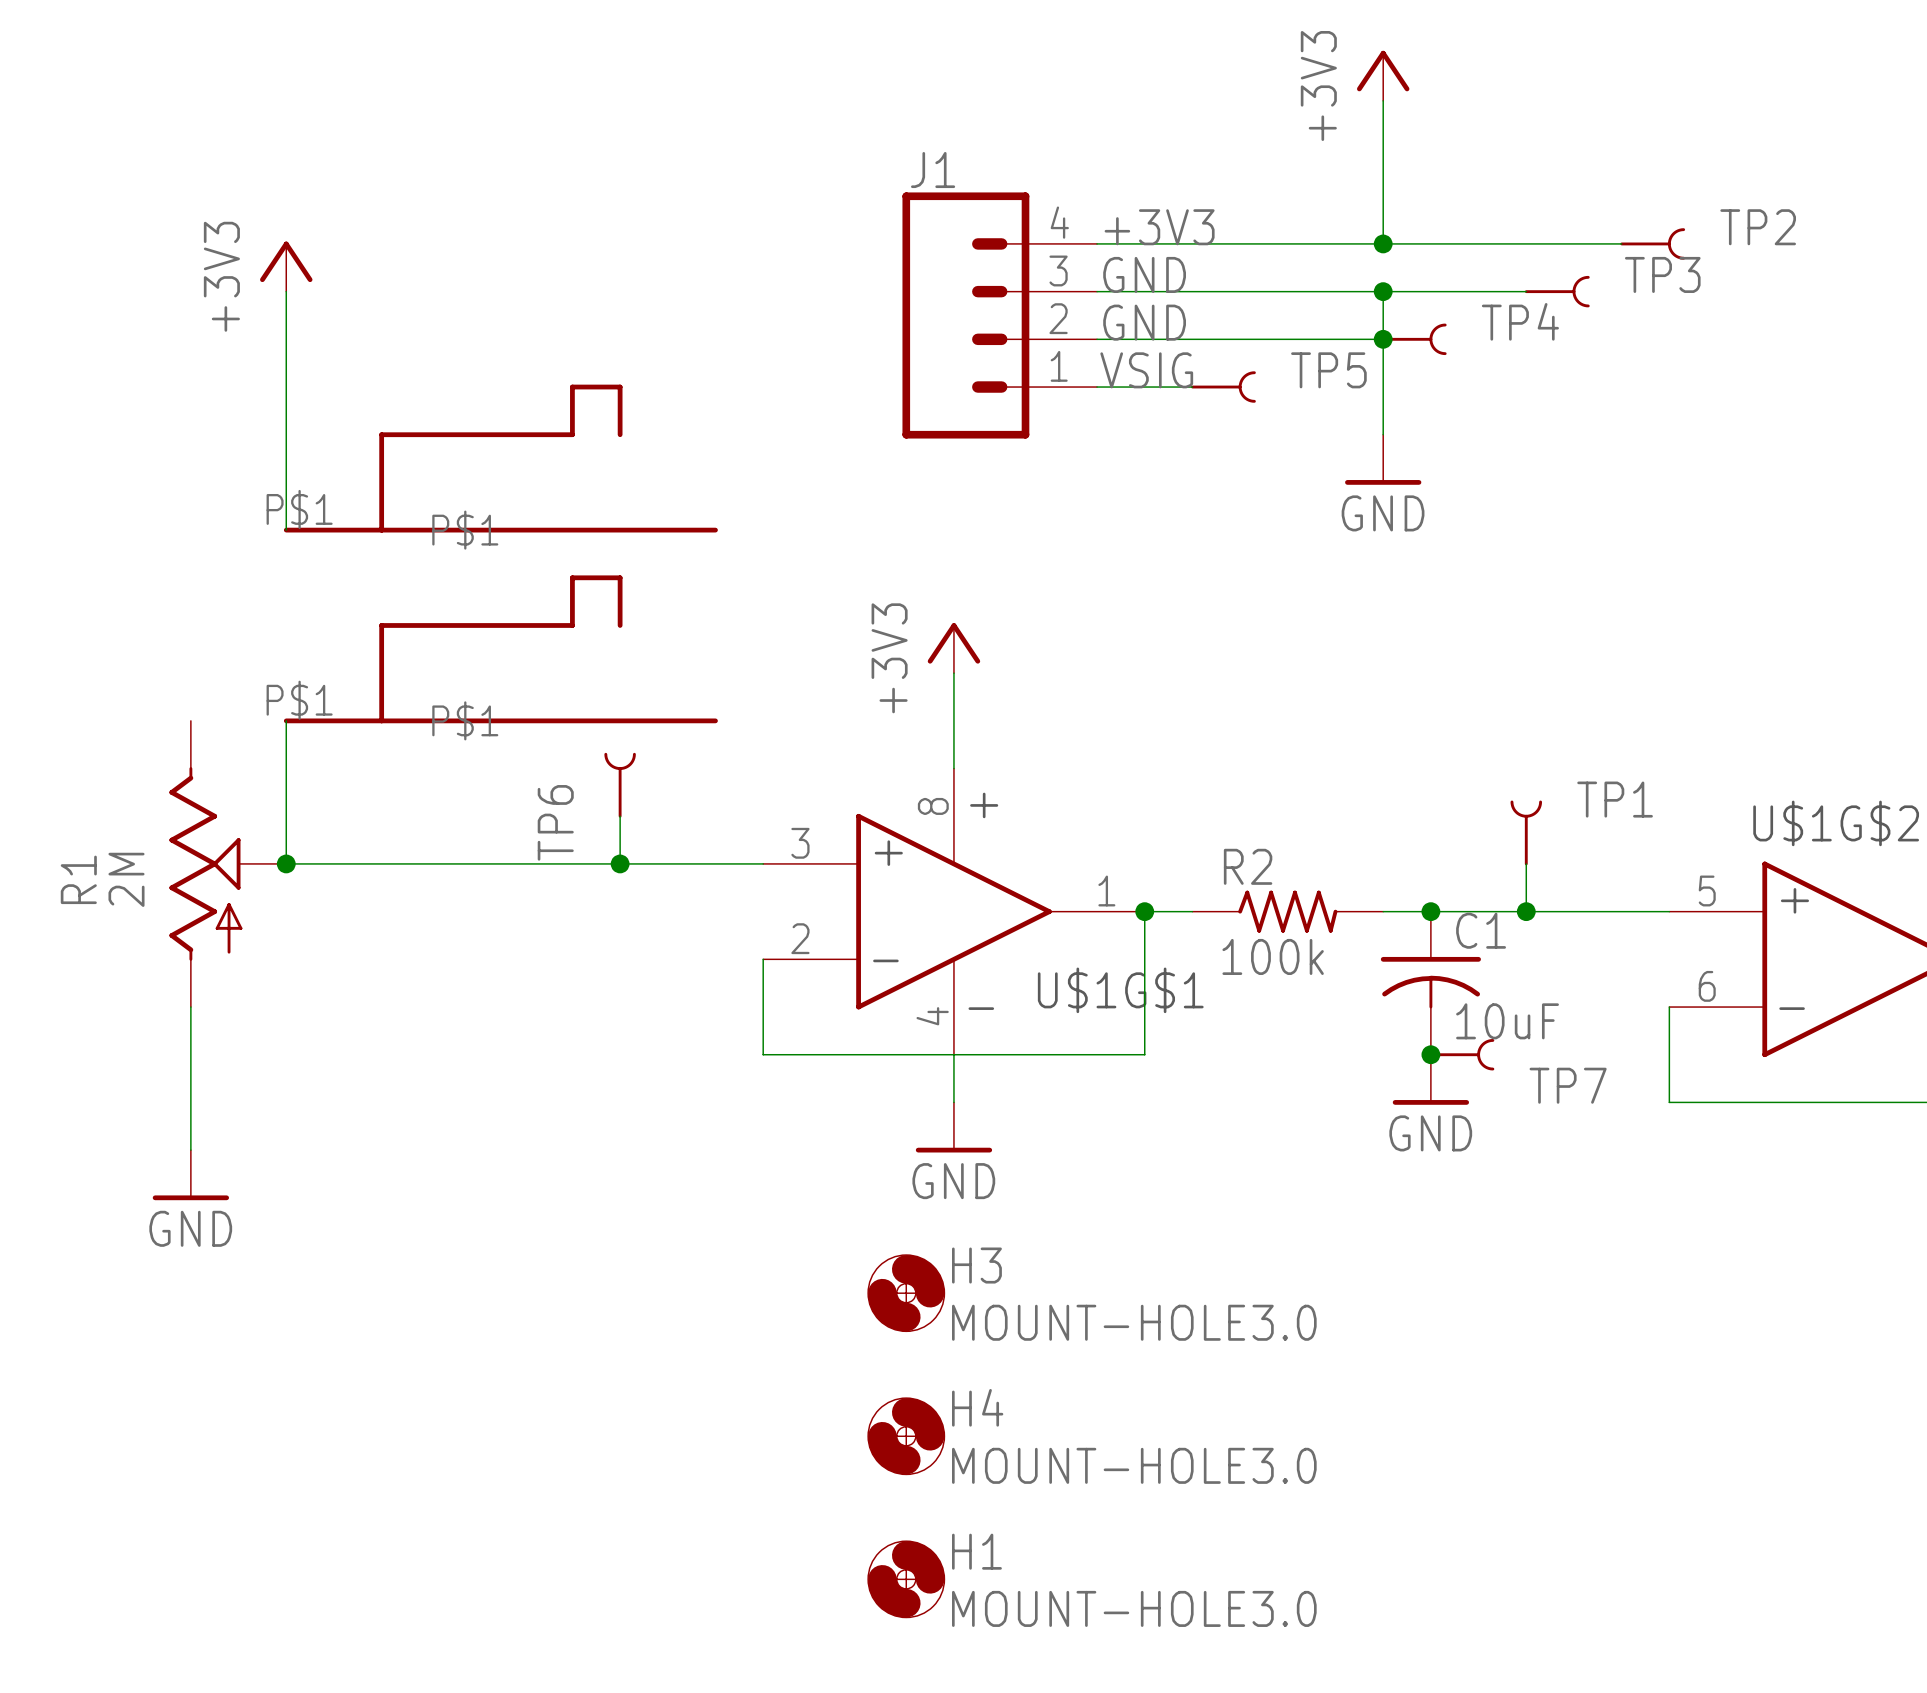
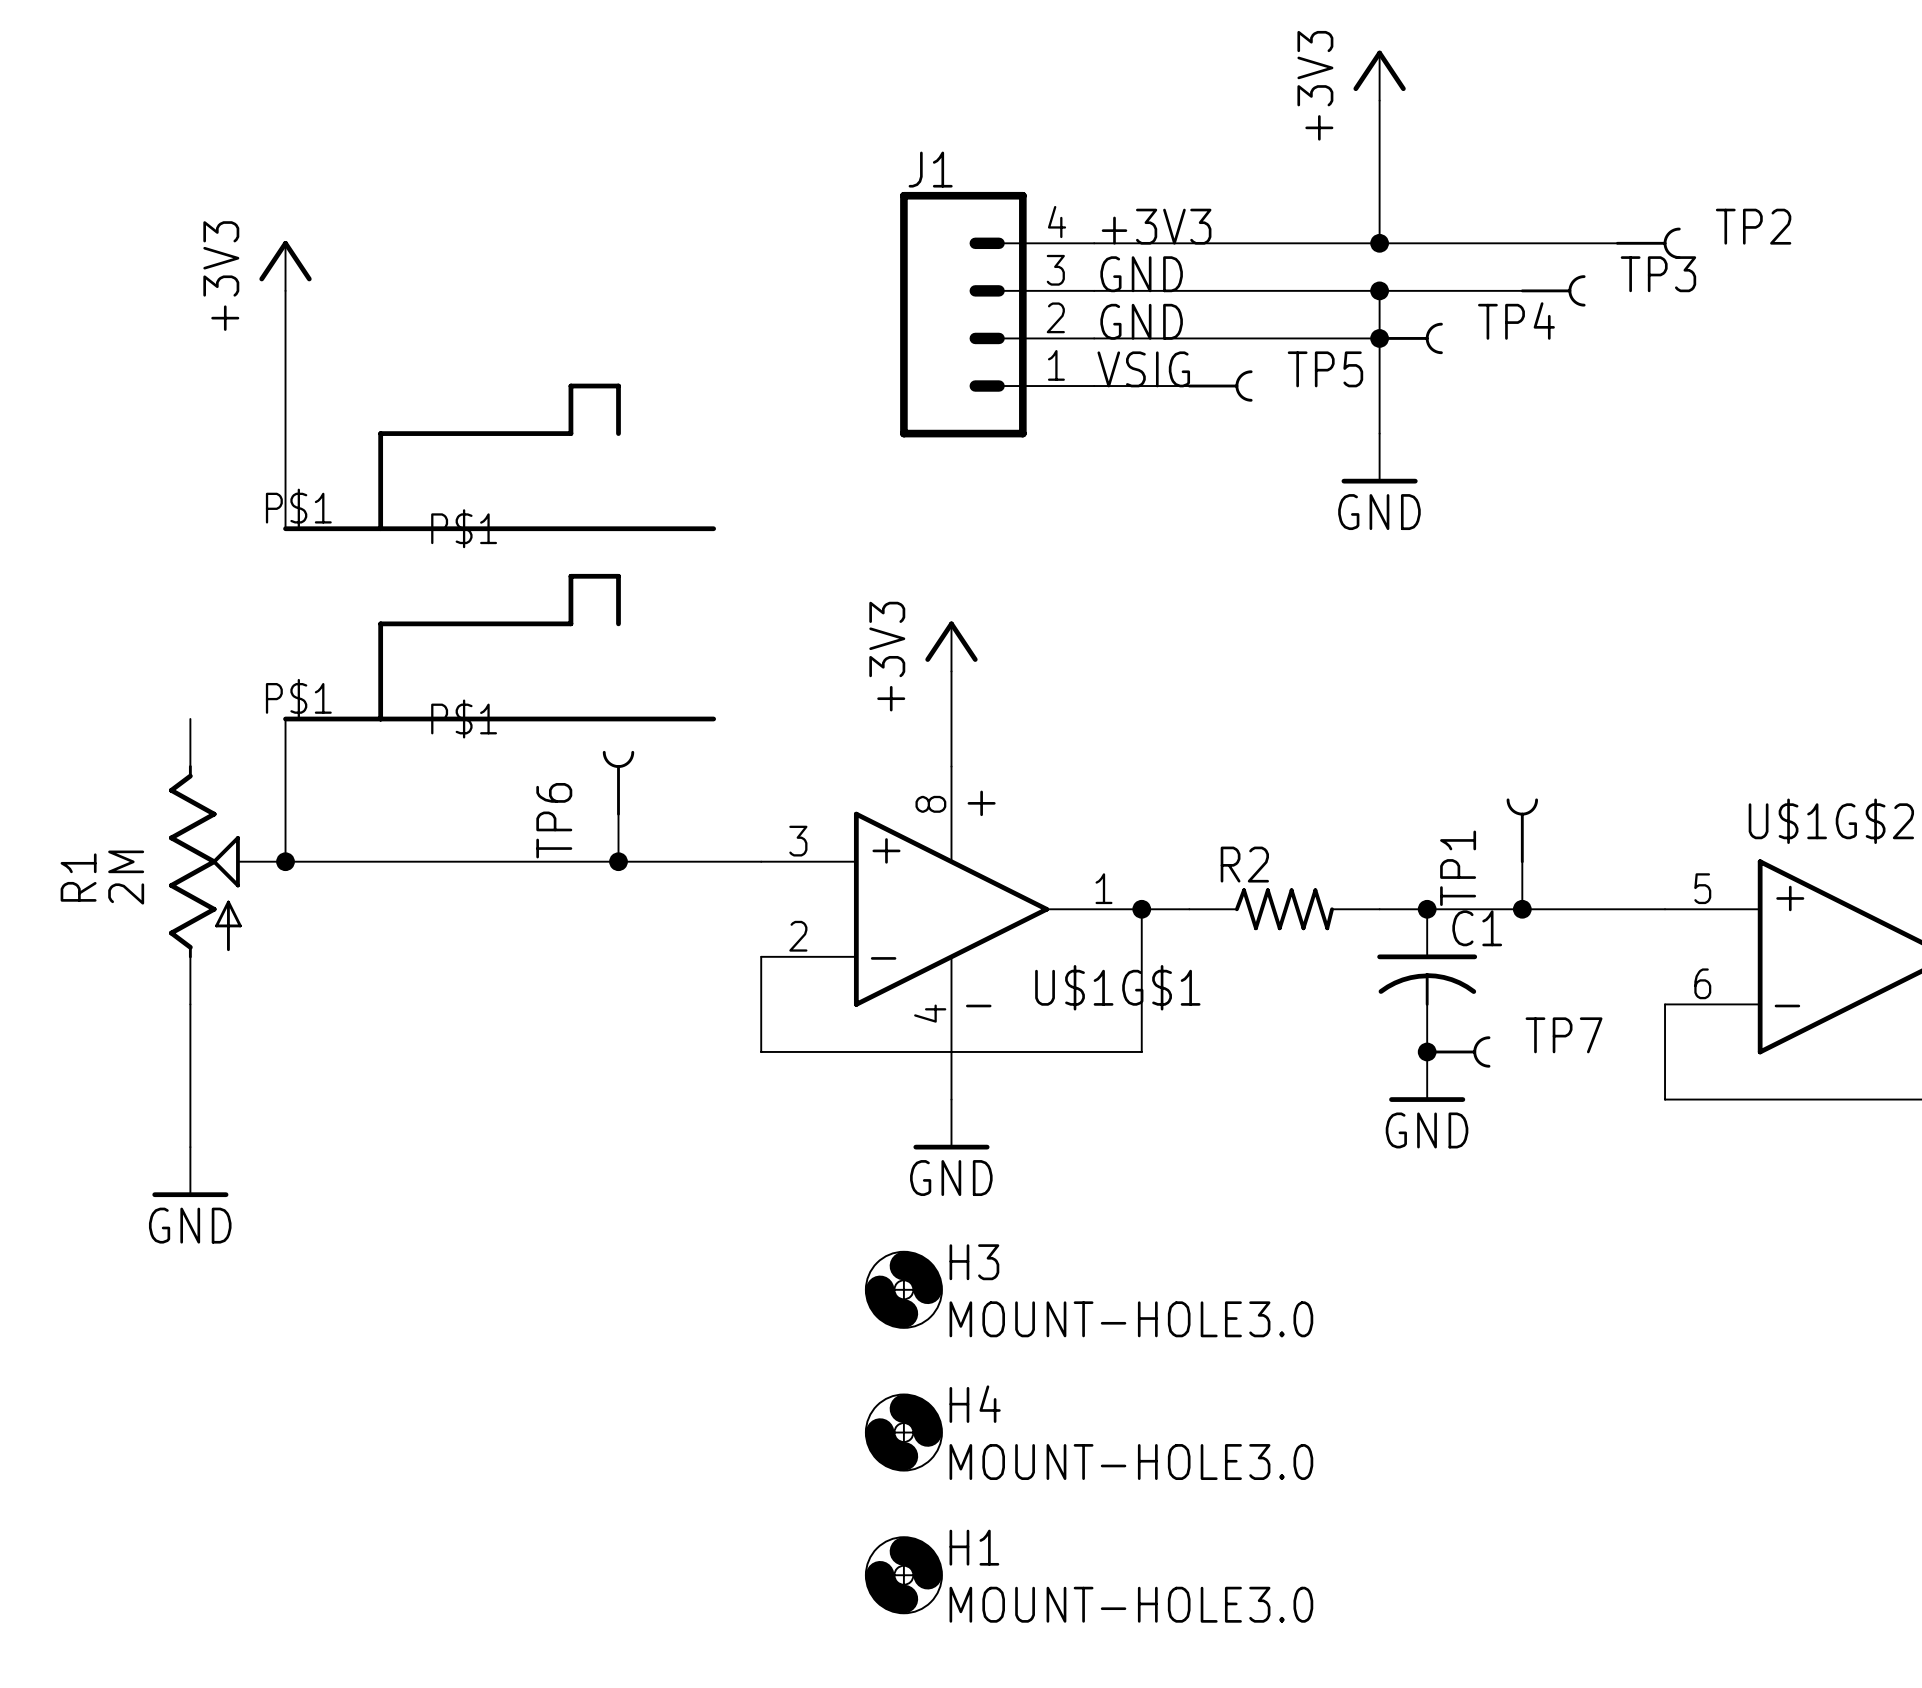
TP1 name rotation: 0° (1615, 799) -> 90° counterclockwise (1458, 868)
TP1 name position: TP1 (1615, 799) -> TP1 (1458, 868)
R2 value: 100k (1273, 956) -> none
C1 value: 10uF (1507, 1021) -> none
TP7 name position: TP7 (1568, 1085) -> TP7 (1564, 1035)

